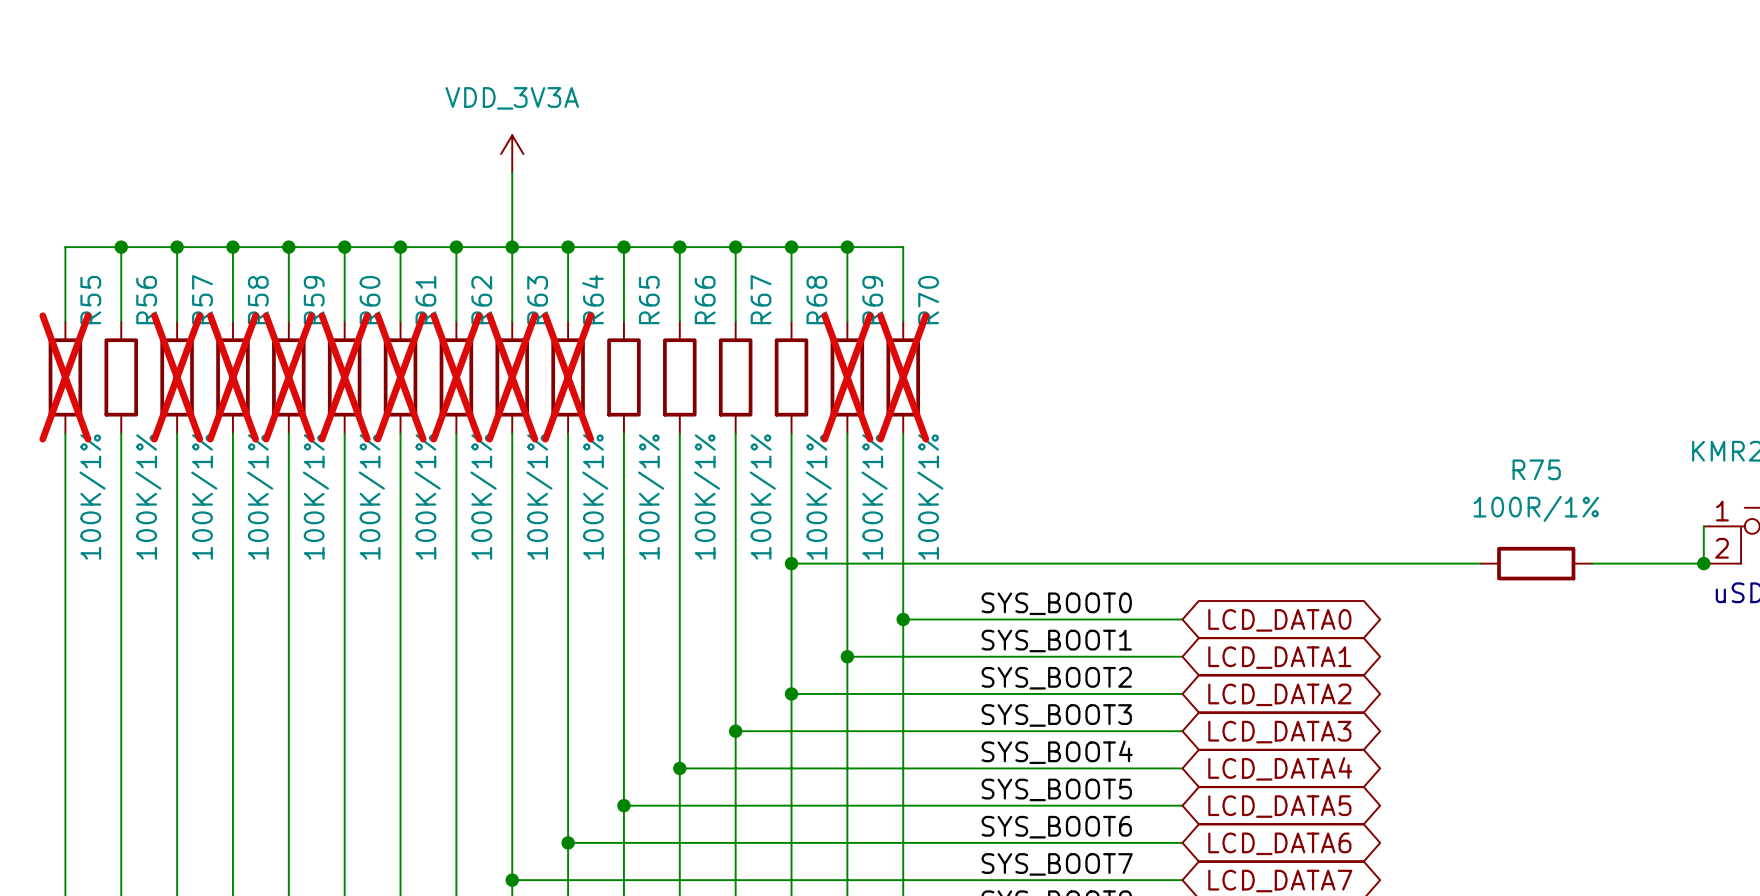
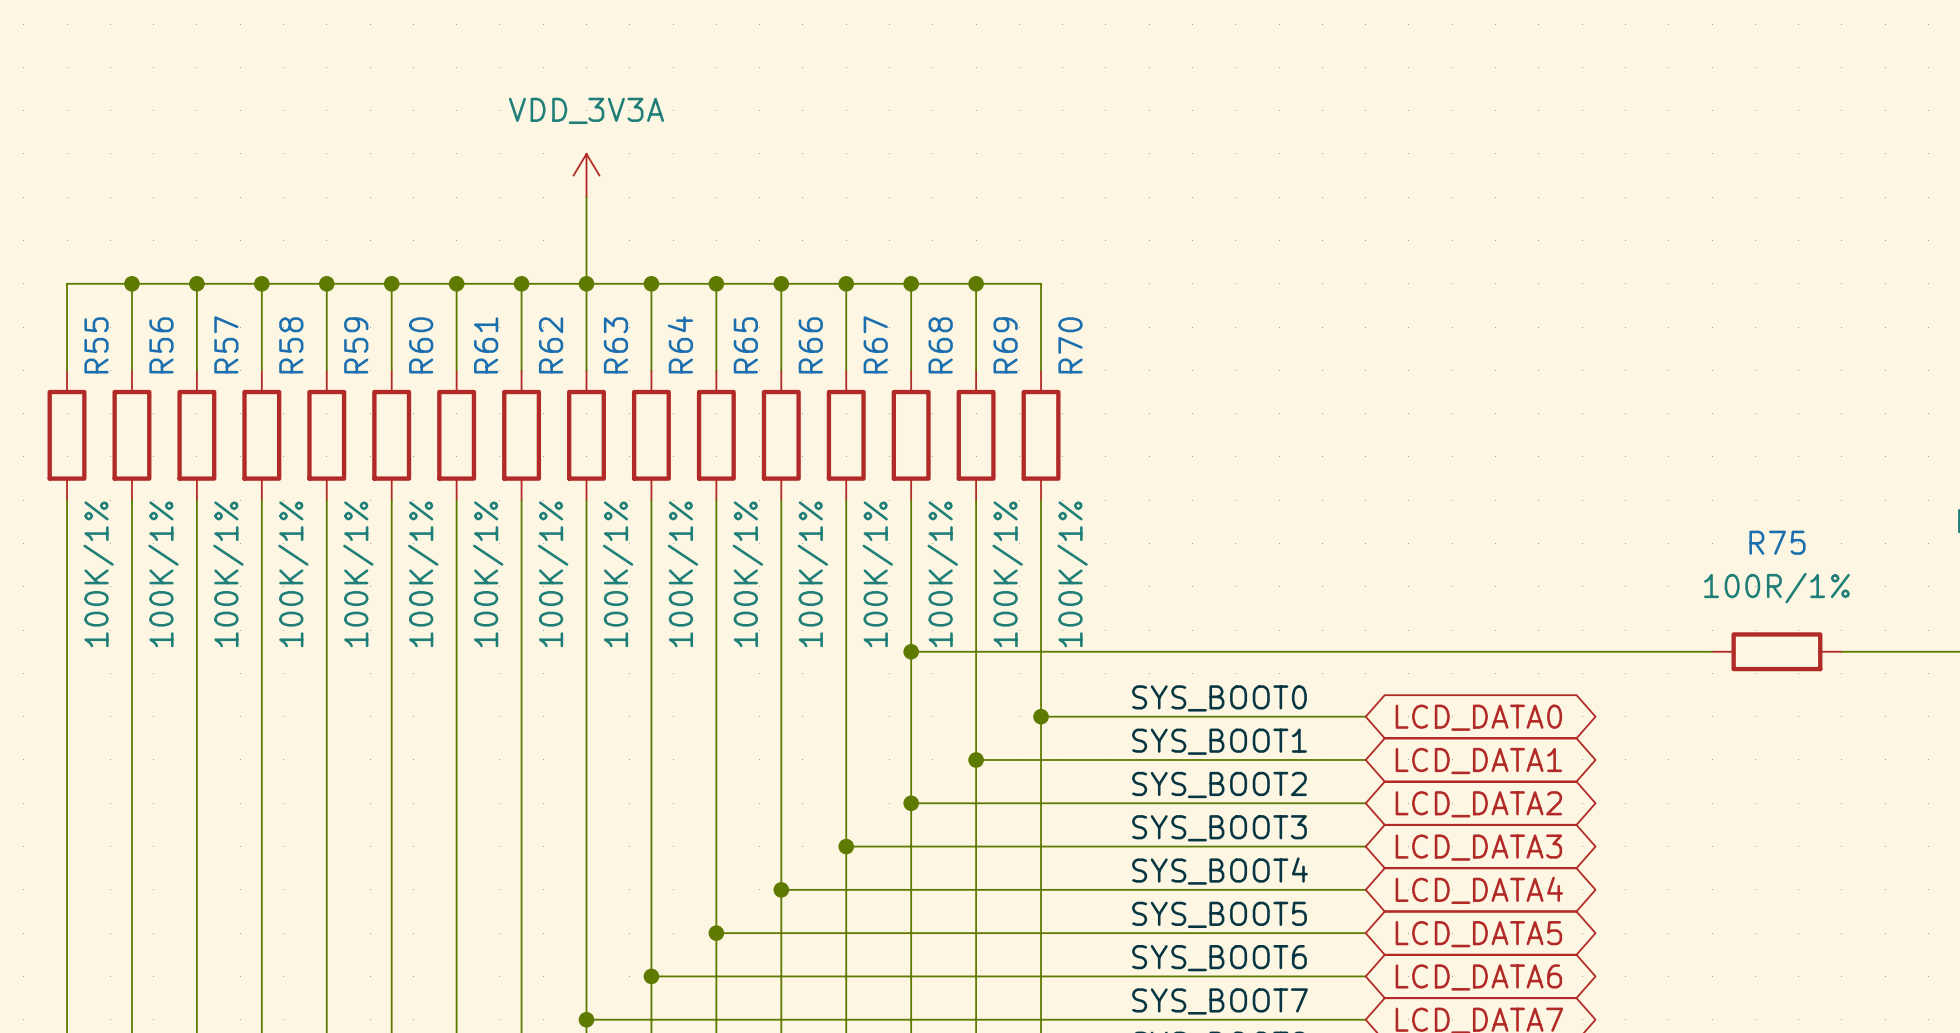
R55 do-not-place cross: (65, 377) -> none
R57 do-not-place cross: (177, 377) -> none
R58 do-not-place cross: (232, 377) -> none
R59 do-not-place cross: (288, 377) -> none
R60 do-not-place cross: (344, 377) -> none
R61 do-not-place cross: (400, 377) -> none
R62 do-not-place cross: (456, 377) -> none
R63 do-not-place cross: (512, 377) -> none
R64 do-not-place cross: (568, 377) -> none
R69 do-not-place cross: (847, 377) -> none
R70 do-not-place cross: (903, 377) -> none

